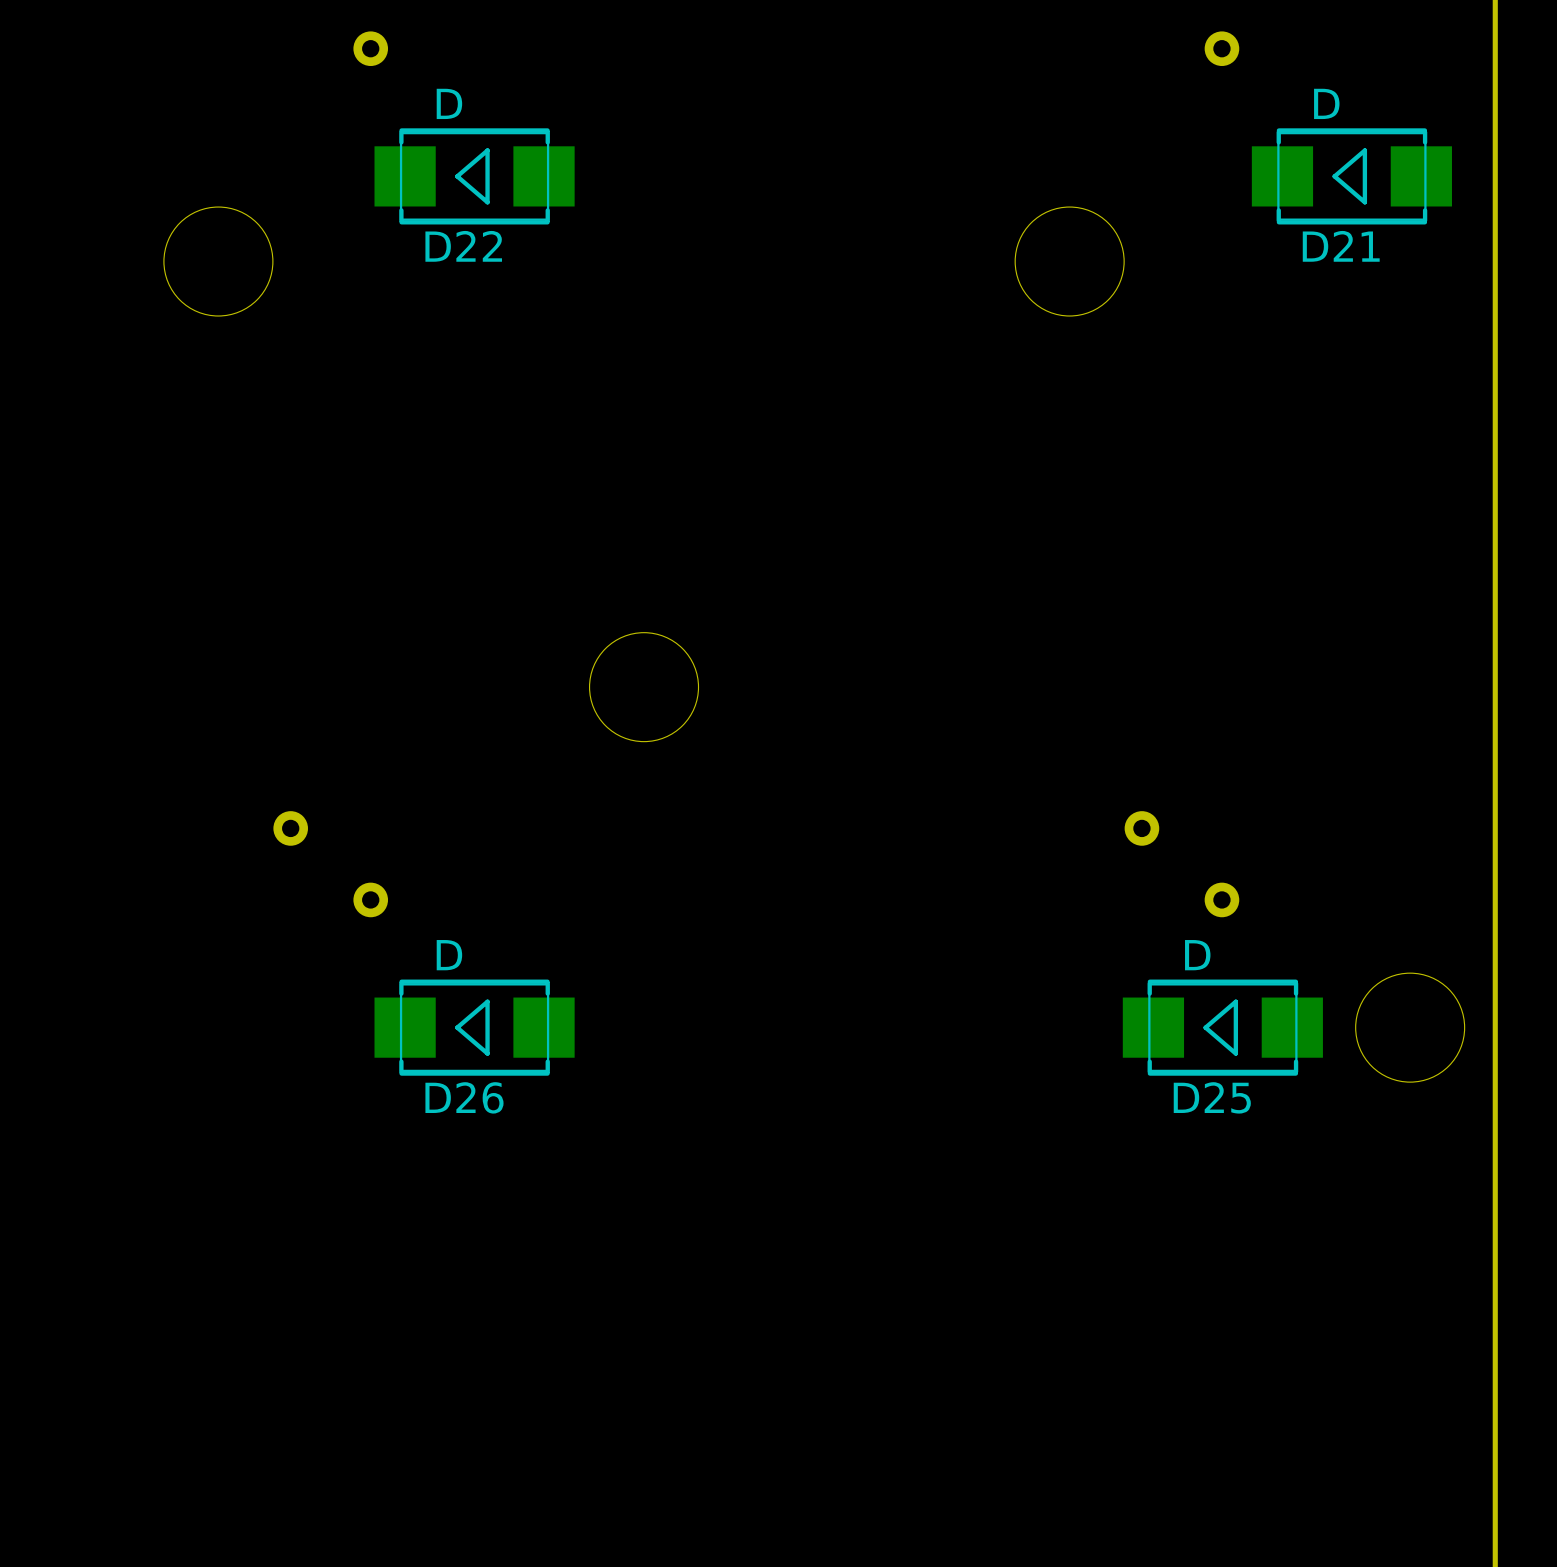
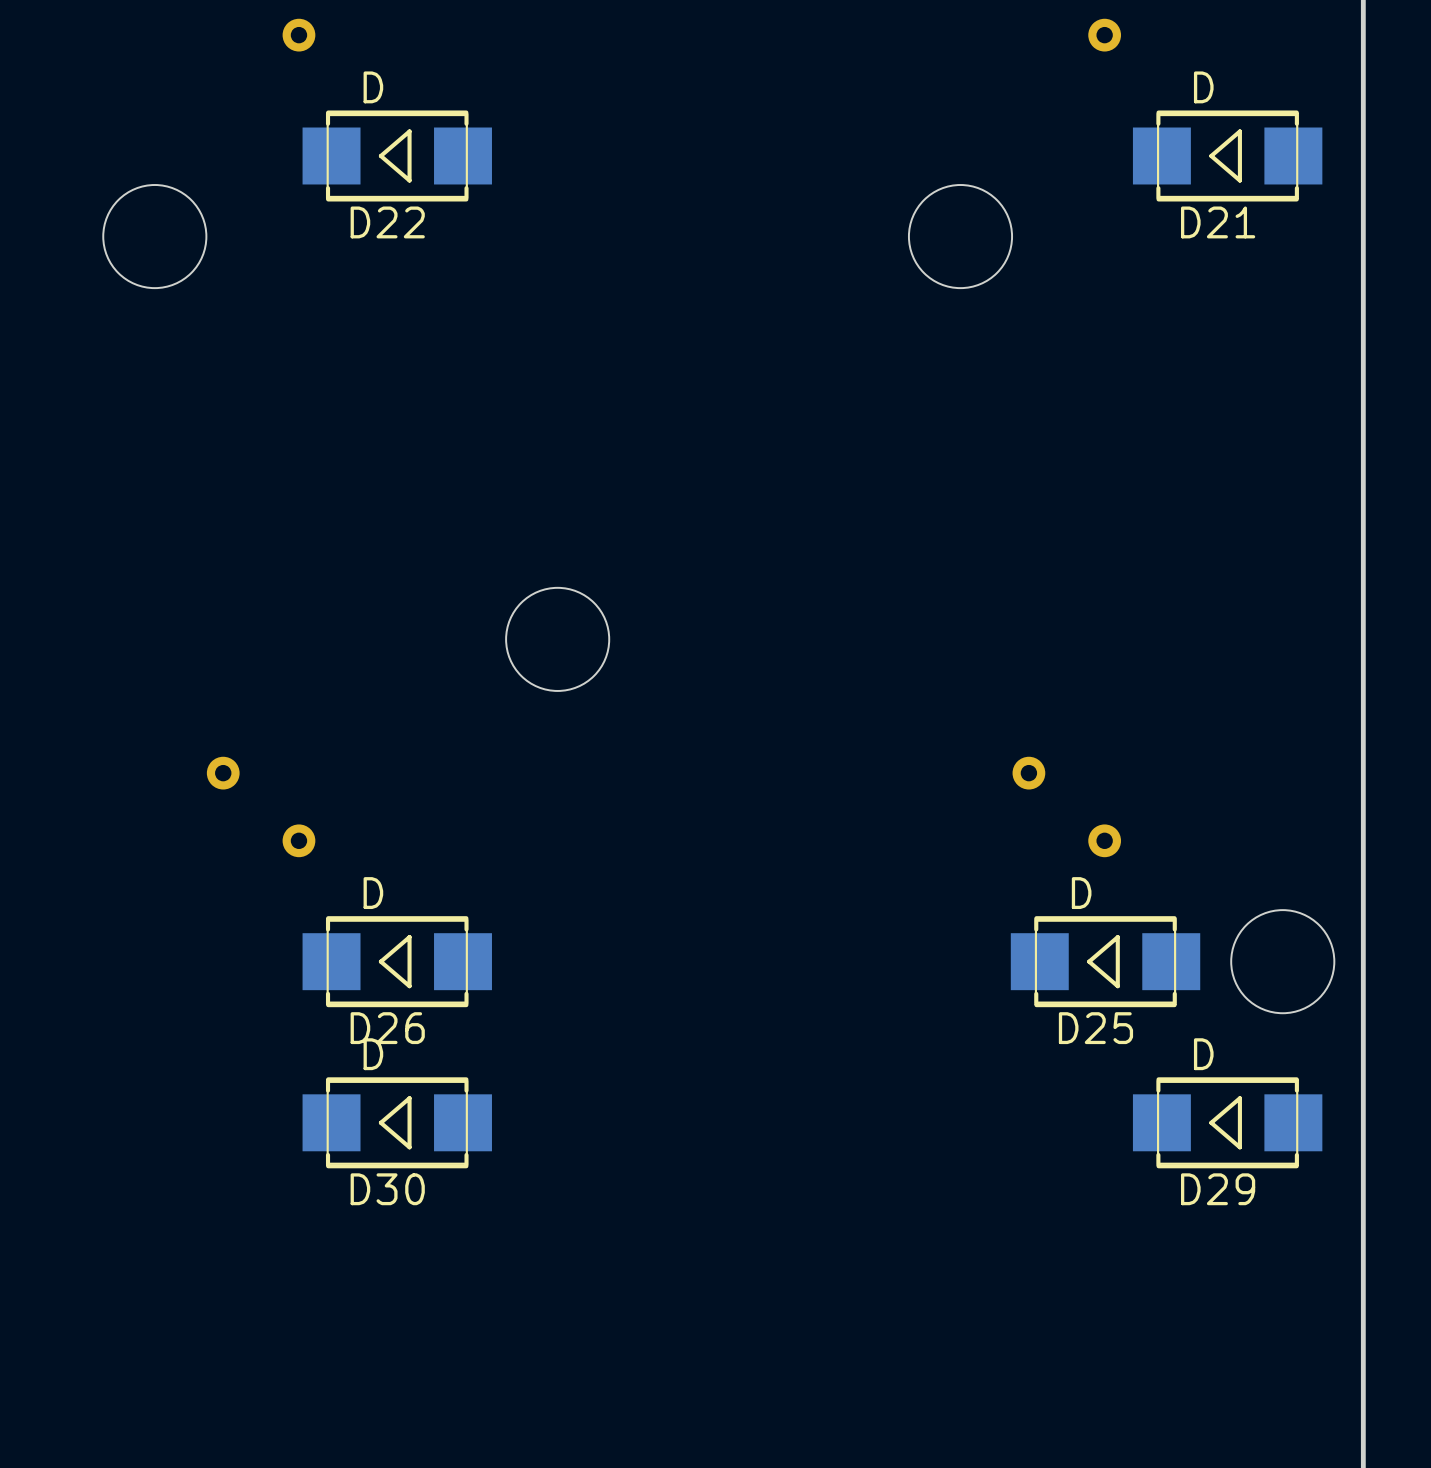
D30: none -> D (397, 1122)
D29: none -> D (1227, 1122)

